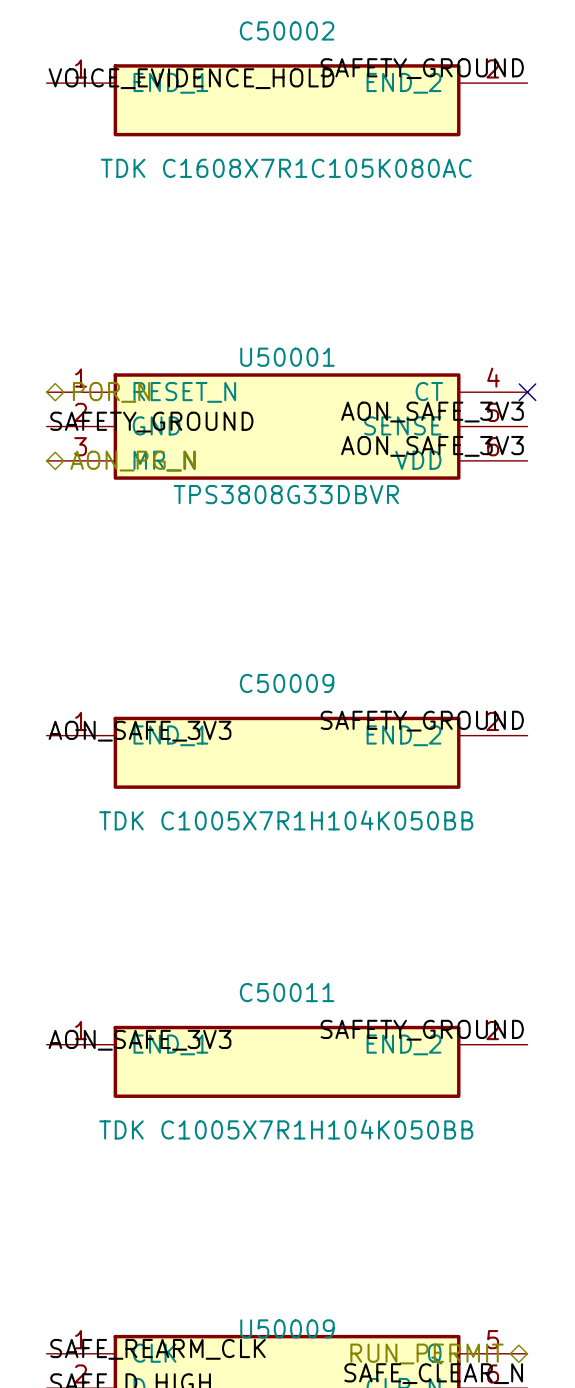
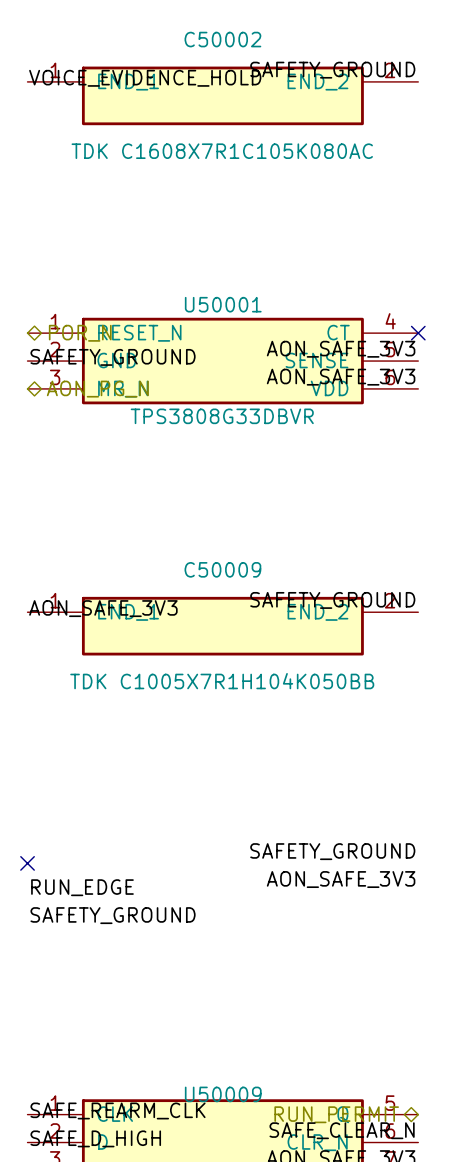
label: AON_SAFE_3V3 (140, 1040) -> none
no-connect mark: none -> (27, 863)
C50011: TDK C1005X7R1H104K050BB (287, 1061) -> none
label: none -> AON_SAFE_3V3 (341, 879)
label: none -> RUN_EDGE (82, 887)
label: none -> SAFETY_GROUND (113, 915)

